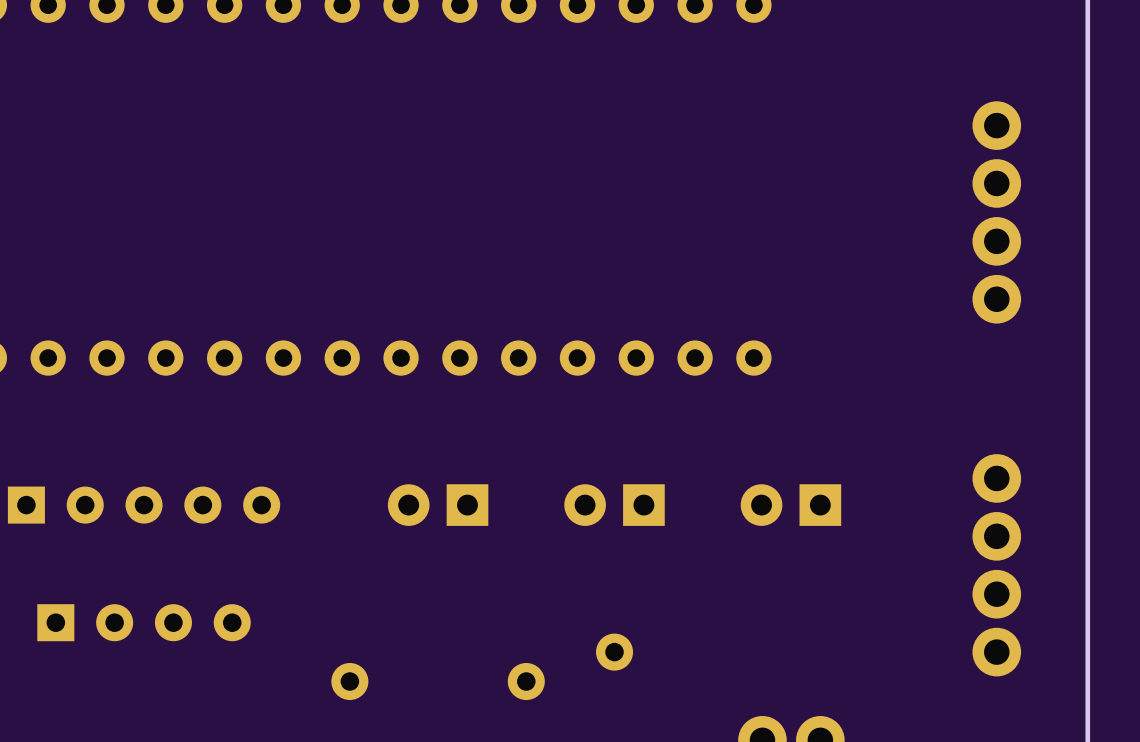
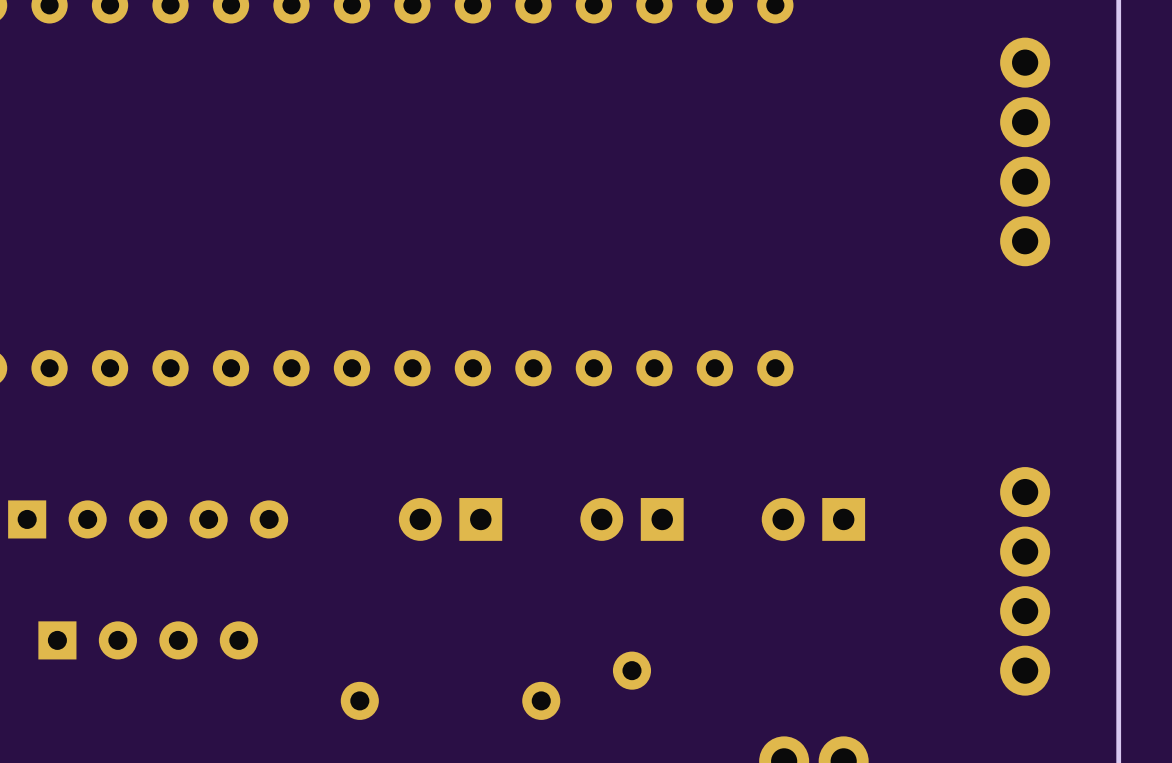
part position: (996, 212) -> (1025, 151)

